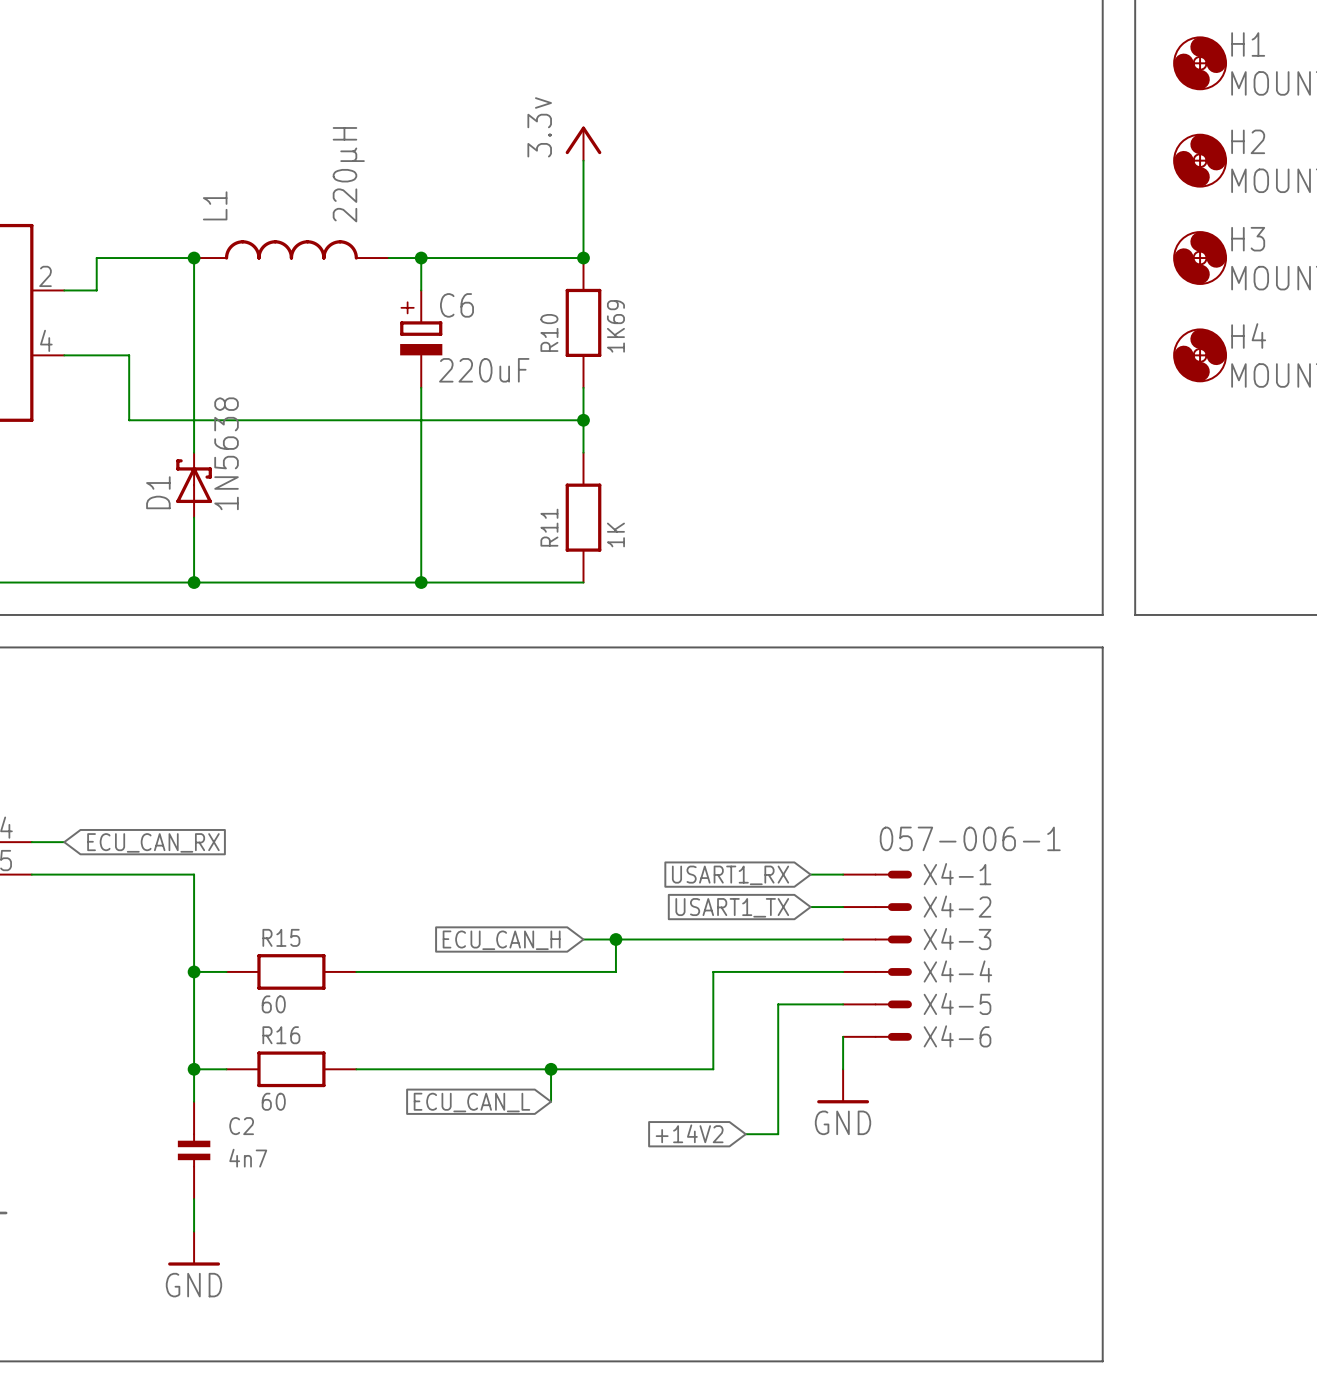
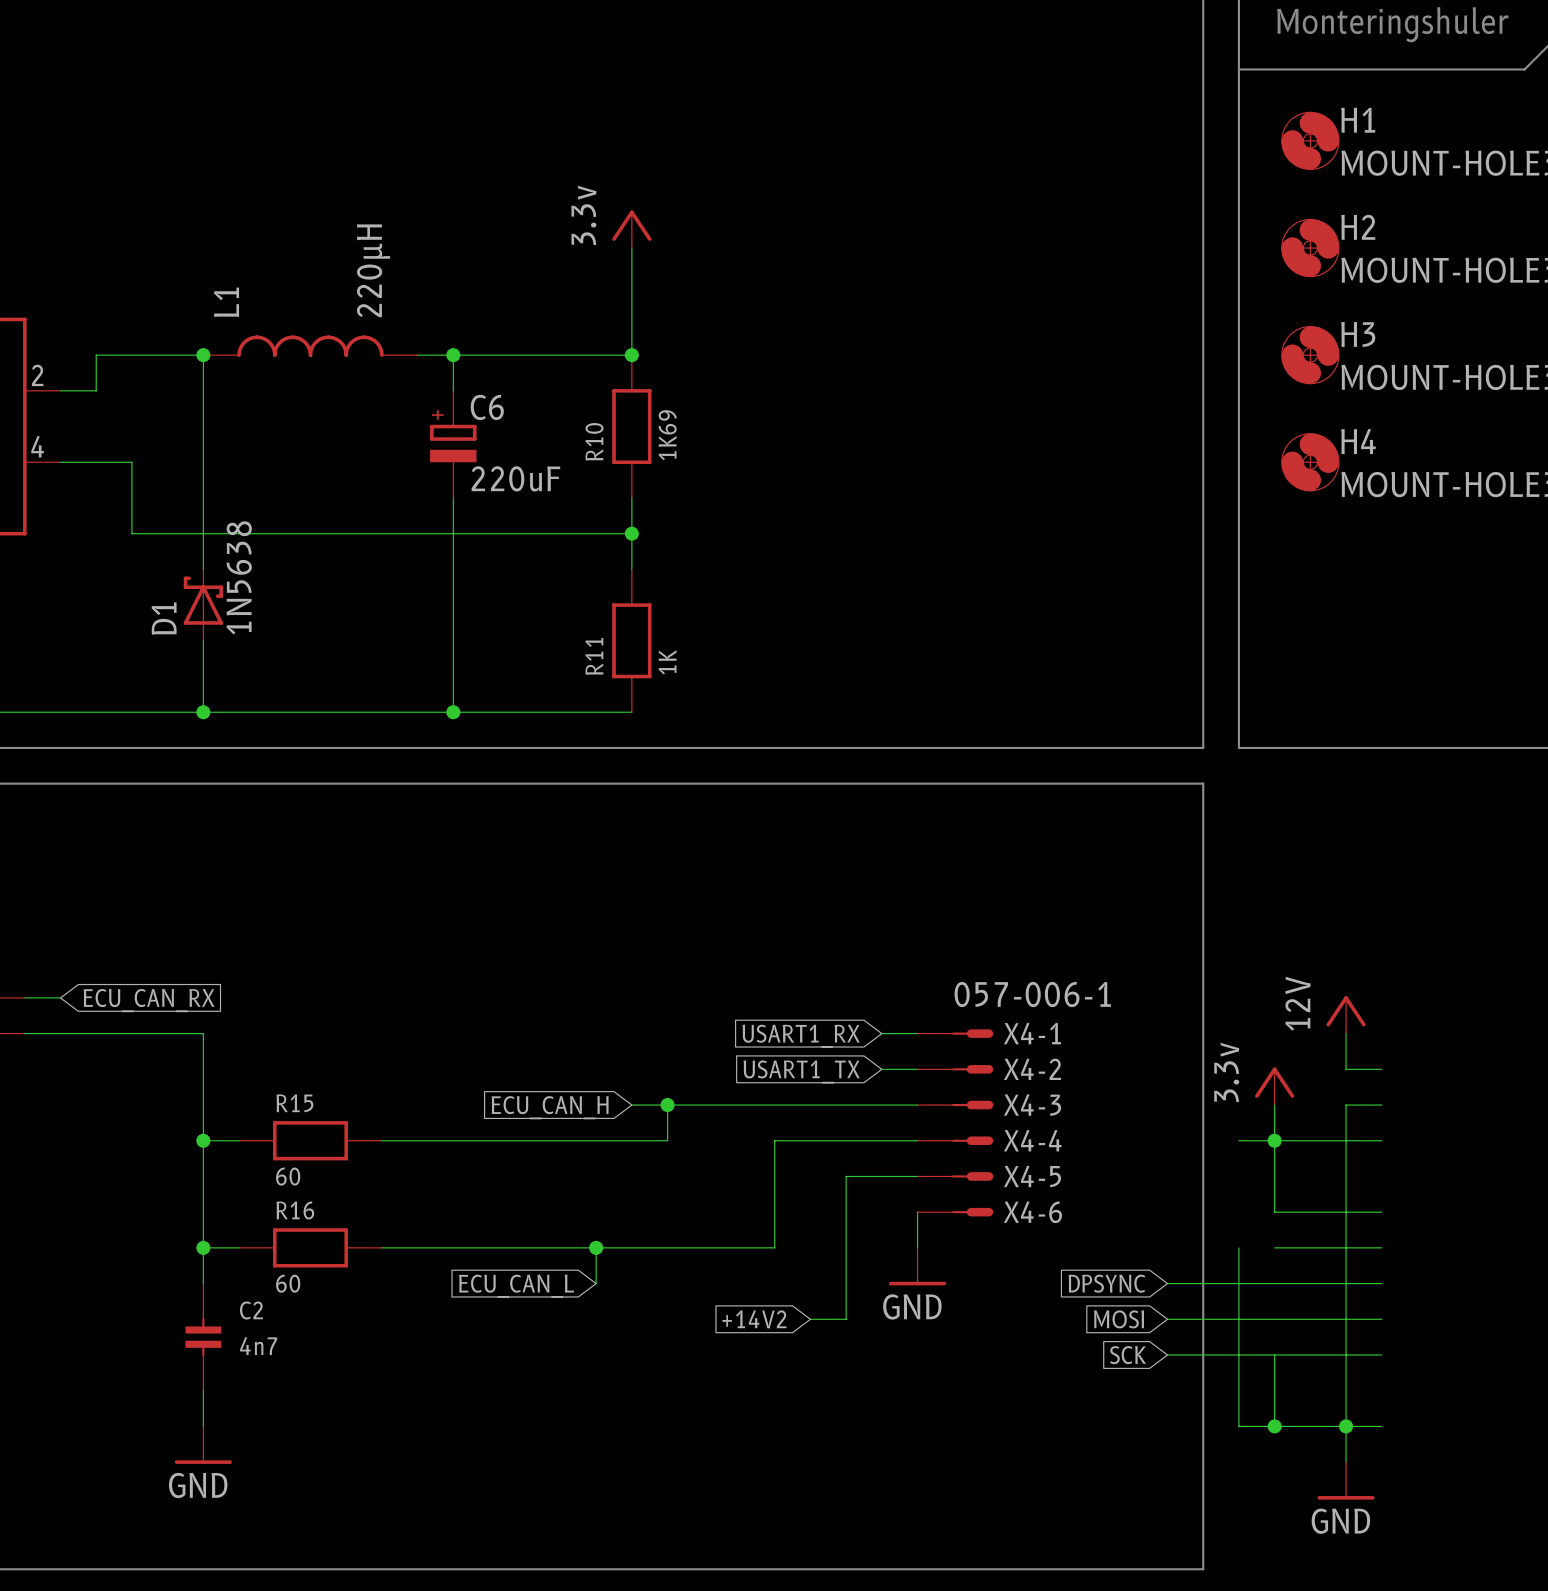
power symbol: none -> 12V (1346, 1014)
wire: none -> (1346, 1033) (1346, 1069) (1381, 1069)
power symbol: none -> 3.3v (1274, 1086)
wire: none -> (1274, 1105) (1274, 1212) (1381, 1212)
wire: none -> (1381, 1105) (1346, 1105) (1346, 1462)
wire: none -> (1238, 1140) (1381, 1140)
junction: none -> (1274, 1140)
wire: none -> (1238, 1247) (1238, 1426) (1381, 1426)
wire: none -> (1274, 1247) (1381, 1247)
global label: none -> DPSYNC (1106, 1283)
wire: none -> (1167, 1283) (1381, 1283)
global label: none -> MOSI (1118, 1319)
wire: none -> (1167, 1319) (1381, 1319)
global label: none -> SCK (1127, 1355)
wire: none -> (1167, 1355) (1381, 1355)
wire: none -> (1274, 1355) (1274, 1426)
junction: none -> (1274, 1426)
junction: none -> (1346, 1426)
power symbol: none -> GND (1346, 1480)

